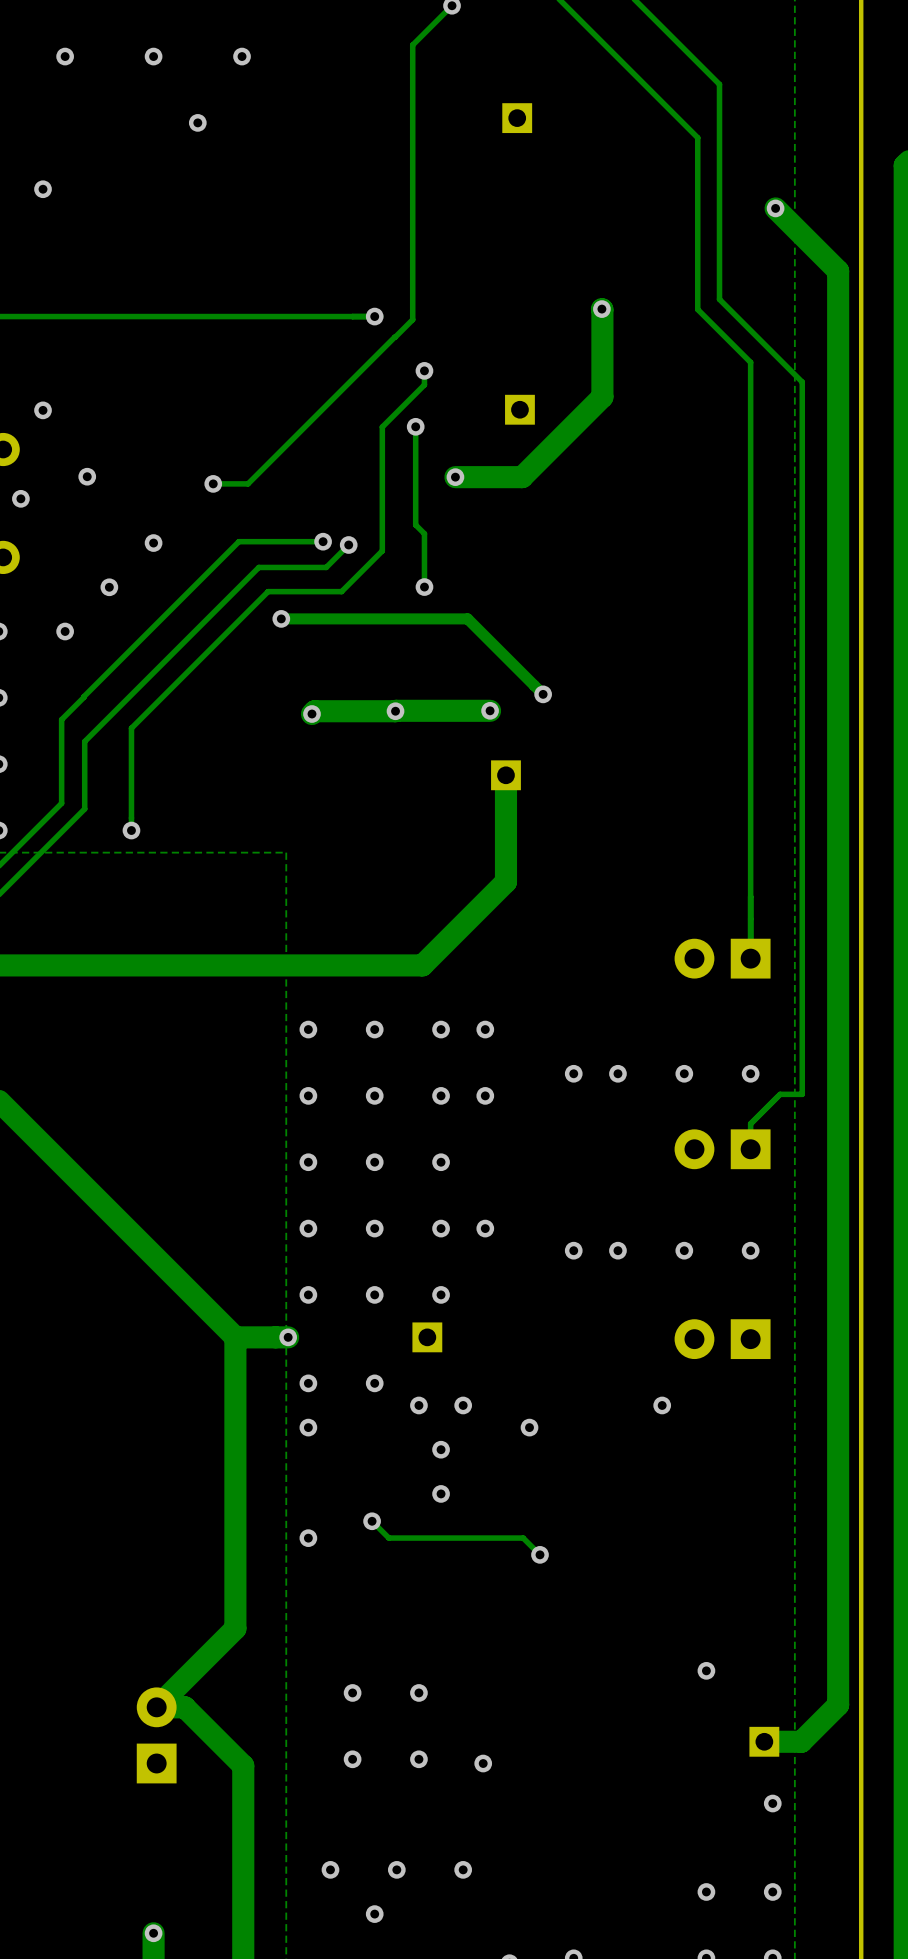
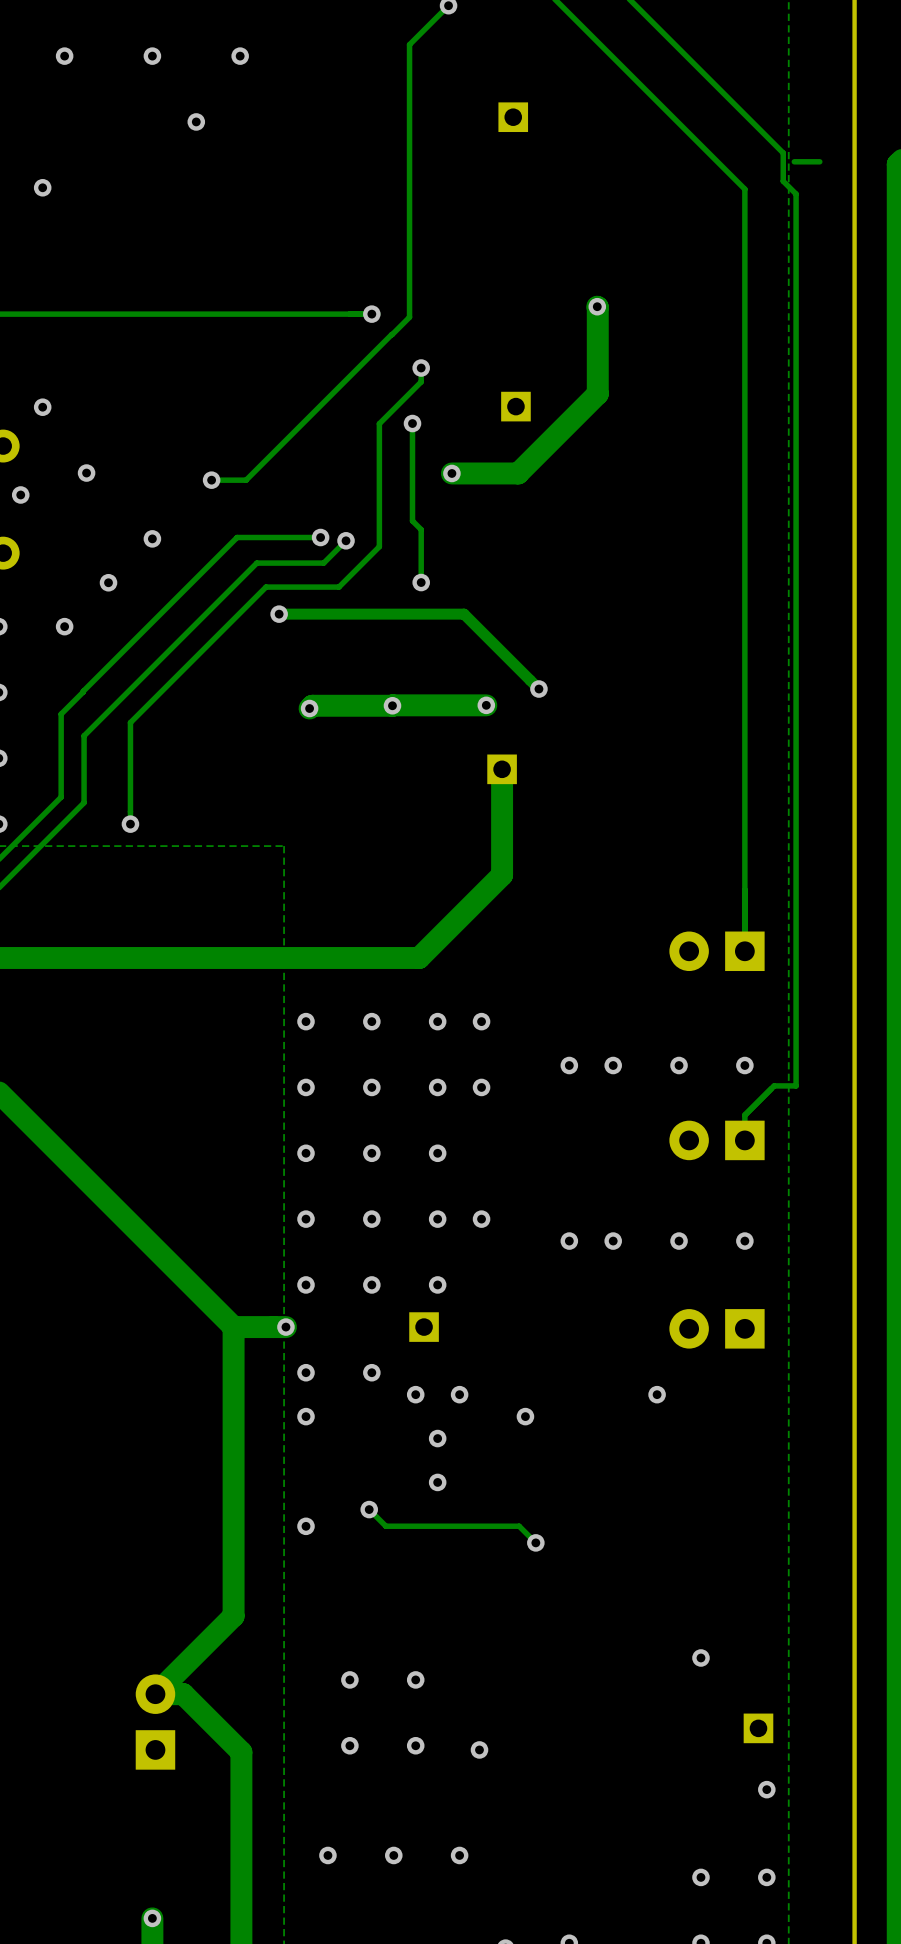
track: (719, 84) (719, 299) (802, 382) -> (713, 83) (783, 153) (783, 181) (796, 194) (796, 379)
track: (697, 137) (697, 309) (750, 362) -> (692, 136) (744, 189) (744, 359)
track: none -> (819, 161) (794, 161)
track: (775, 208) (838, 270) (838, 1705) (801, 1741) (764, 1741) -> none
via: (775, 208) -> none
via: (374, 1914) -> none

